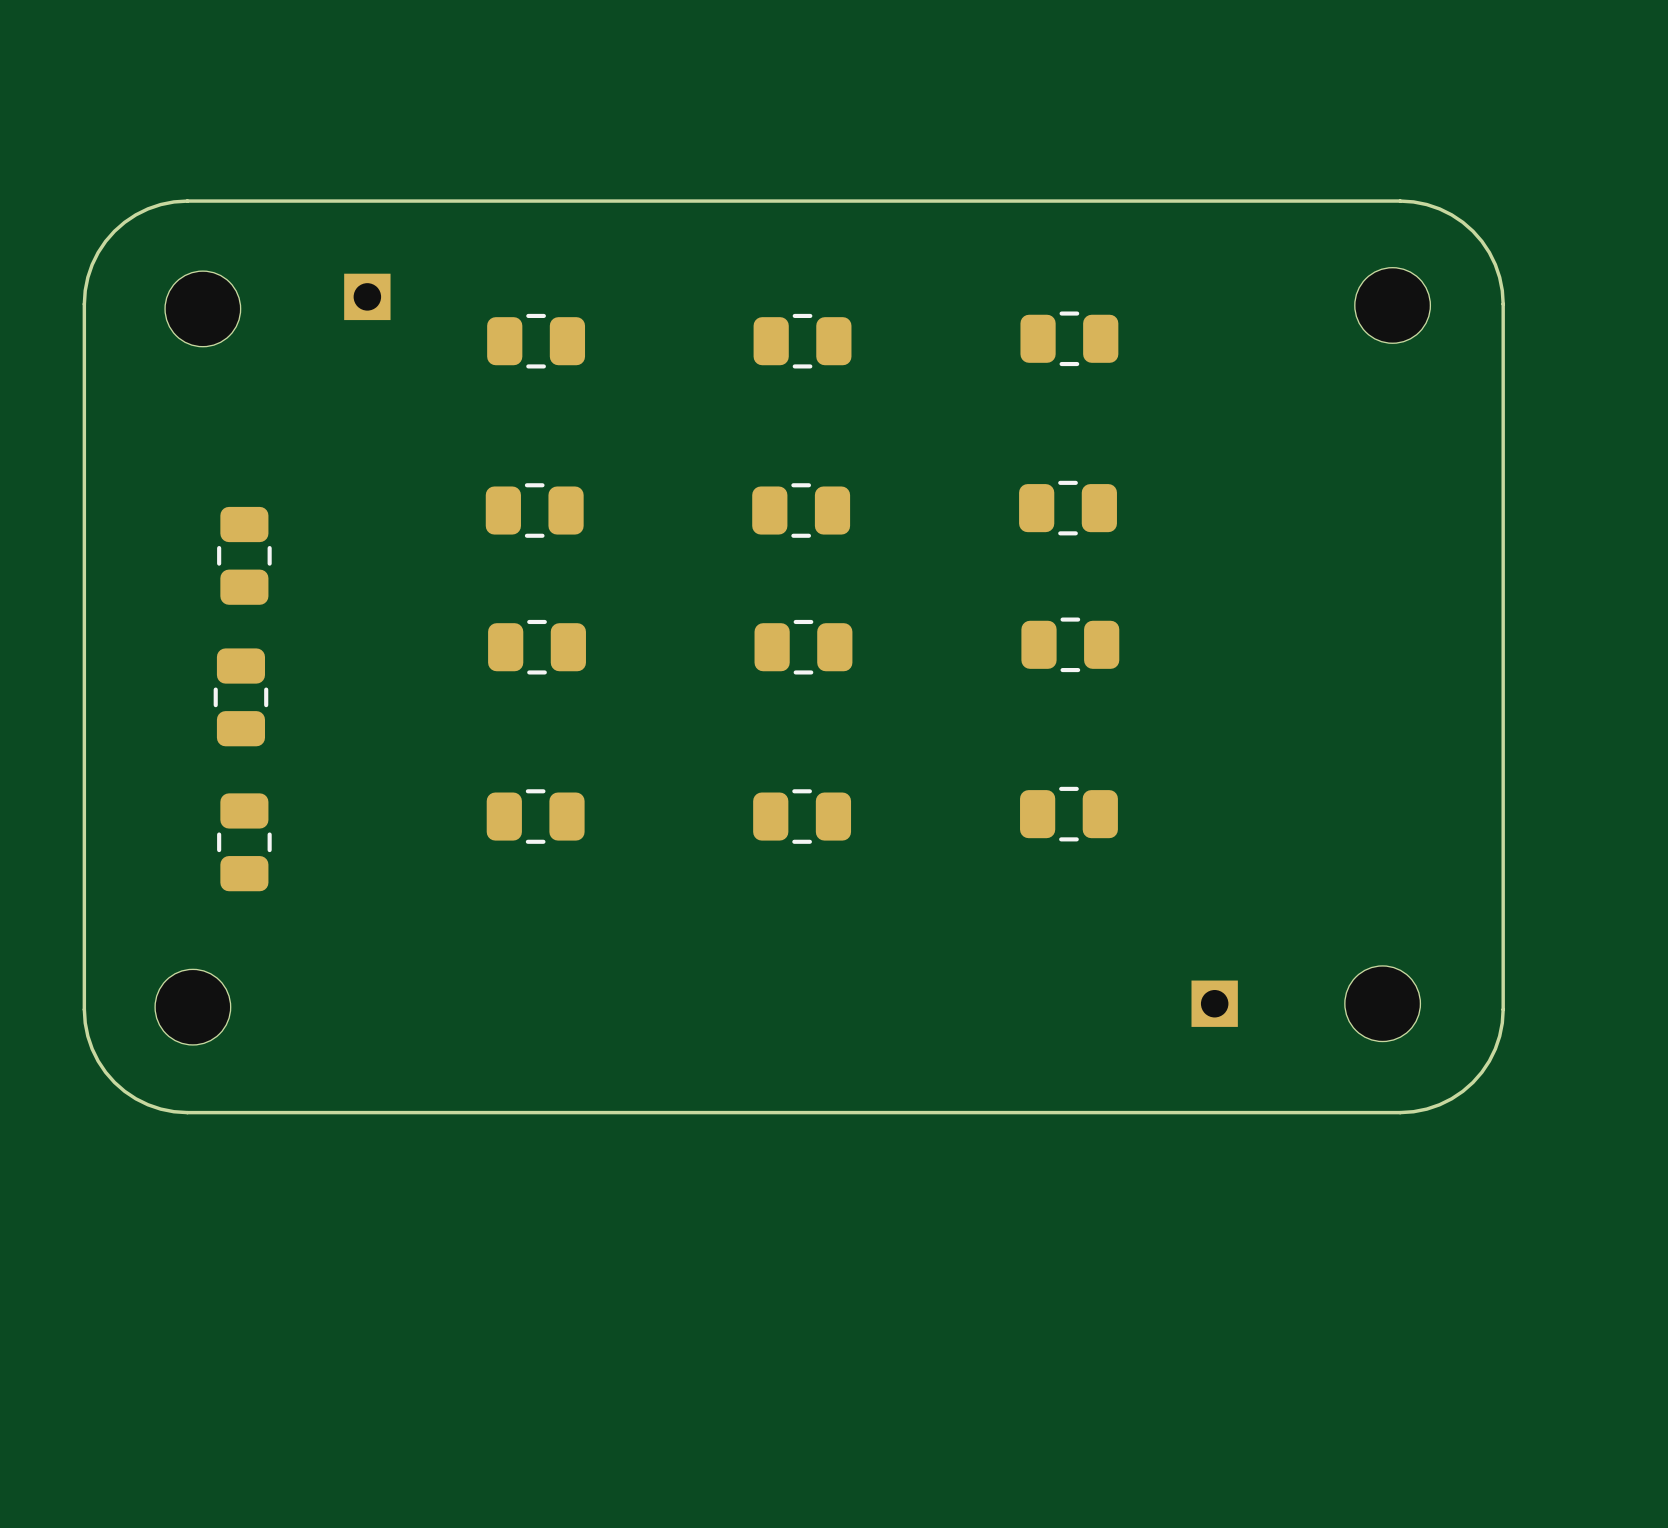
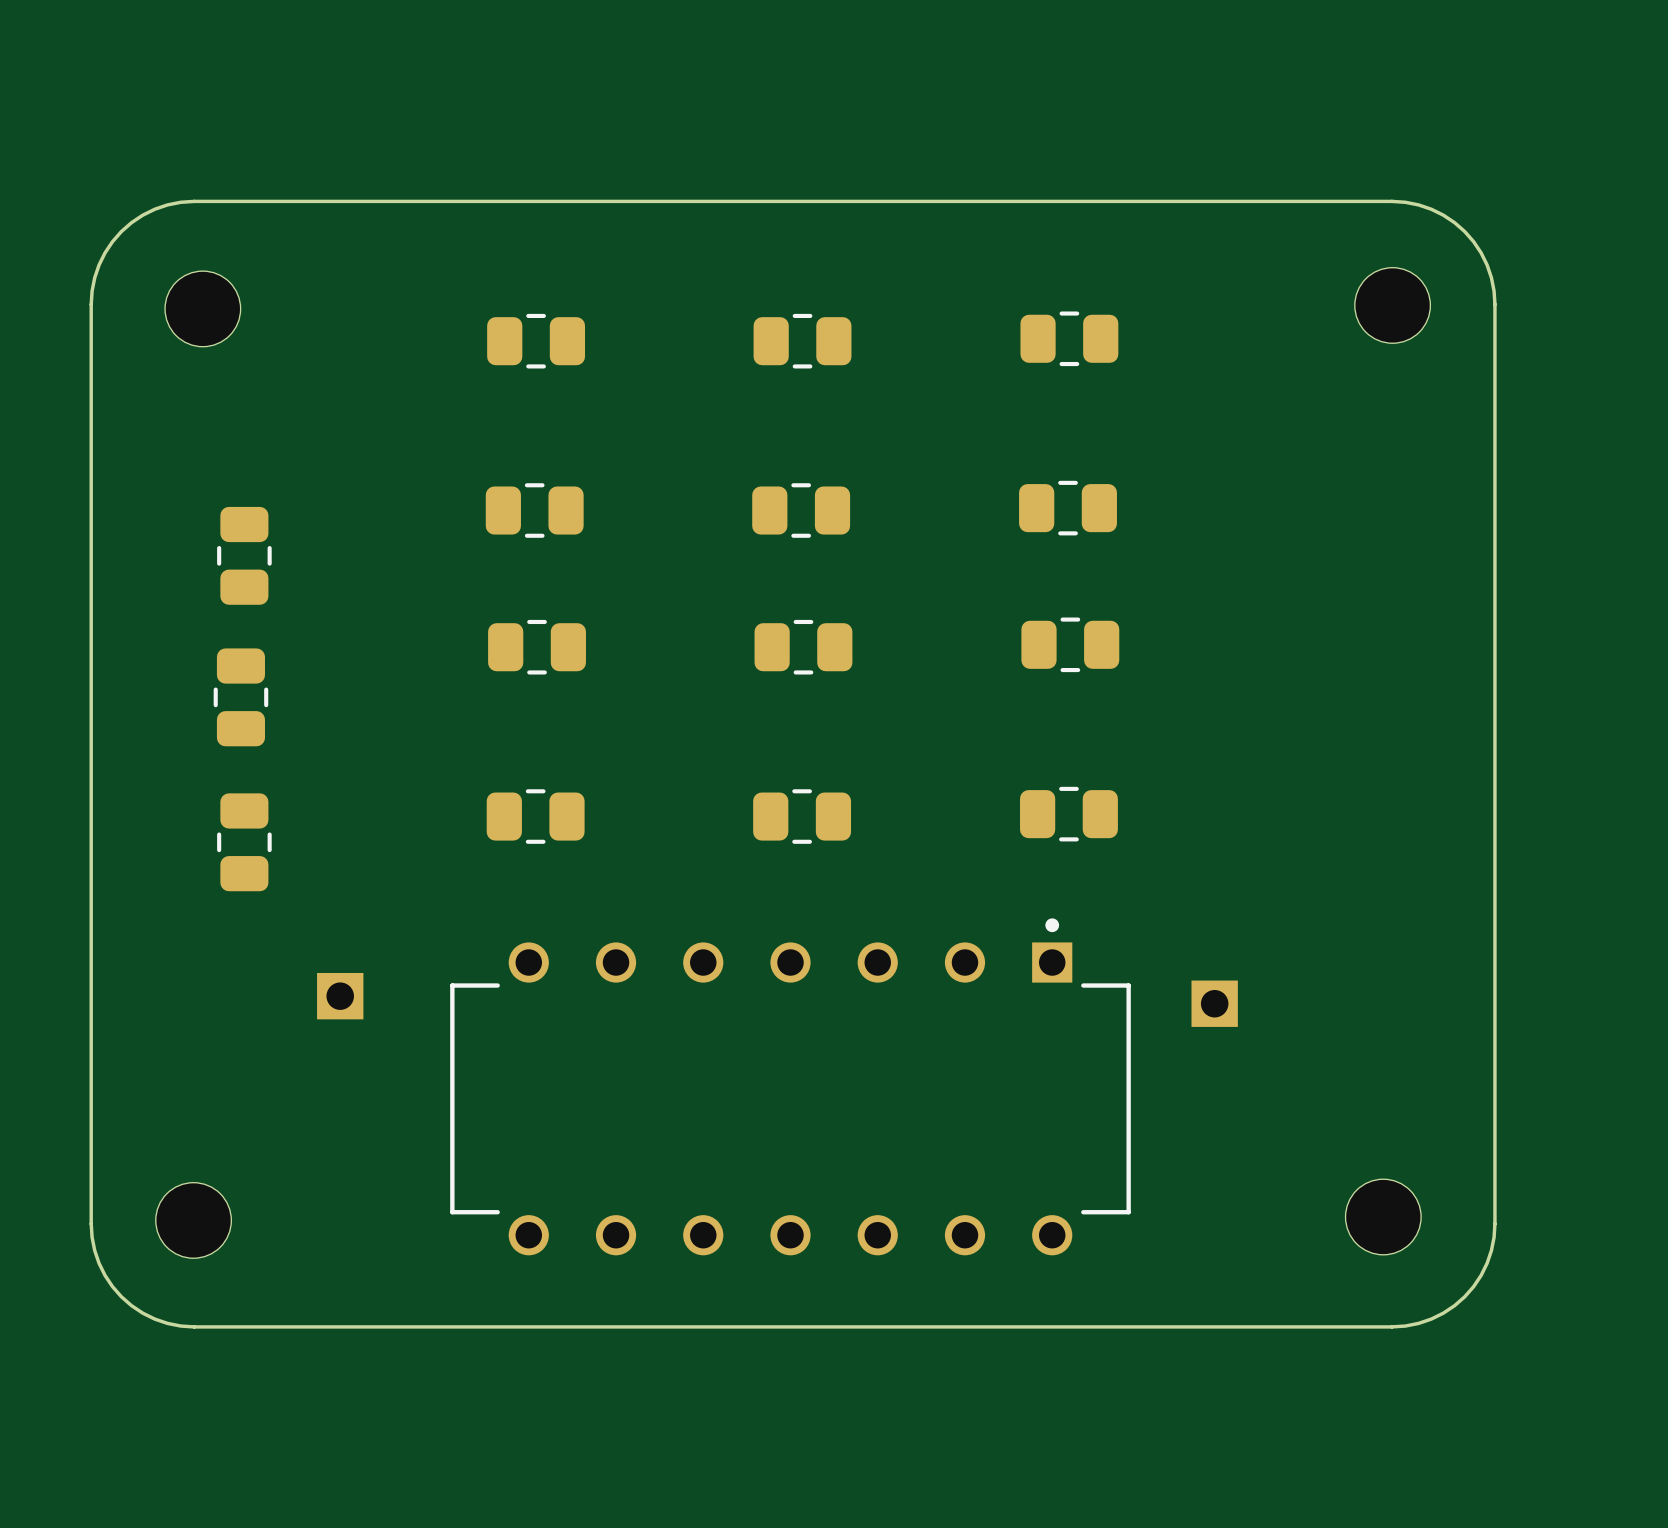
board edge: (1400, 201) (187, 201) (160, 204) (135, 214) (114, 231) (98, 252) (87, 277) (84, 304) (84, 1009) (87, 1036) (98, 1061) (114, 1082) (135, 1098) (160, 1109) (187, 1112) (1400, 1112) (1426, 1109) (1451, 1098) (1473, 1082) (1489, 1061) (1499, 1036) (1503, 1009) (1503, 304) (1499, 277) (1495, 264) (1489, 252) (1473, 231) (1462, 222) (1439, 208) (1426, 204) (1400, 201) -> (1391, 201) (1418, 204) (1431, 209) (1443, 215) (1464, 231) (1481, 252) (1487, 265) (1494, 290) (1494, 304) (1494, 1223) (1494, 1237) (1487, 1263) (1473, 1286) (1454, 1305) (1443, 1313) (1418, 1323) (1391, 1326) (194, 1326) (180, 1326) (154, 1319) (131, 1305) (112, 1286) (99, 1263) (94, 1250) (91, 1223) (91, 304) (94, 277) (105, 252) (121, 231) (131, 222) (154, 209) (180, 202) (194, 201) (1391, 201)
part position: (367, 296) -> (340, 996)
part position: (1382, 1003) -> (1383, 1217)
part position: (192, 1007) -> (193, 1220)
part: none -> (790, 1086)

